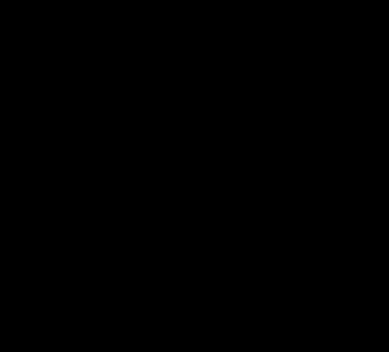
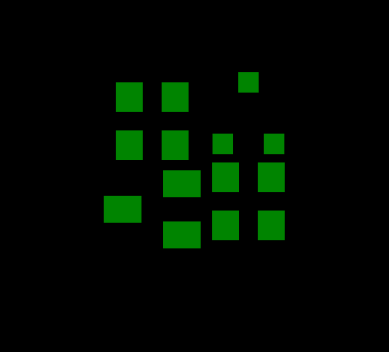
part: none -> (152, 97)
part: none -> (248, 113)
part: none -> (152, 145)
part: none -> (248, 177)
part: none -> (152, 209)
part: none -> (248, 225)

